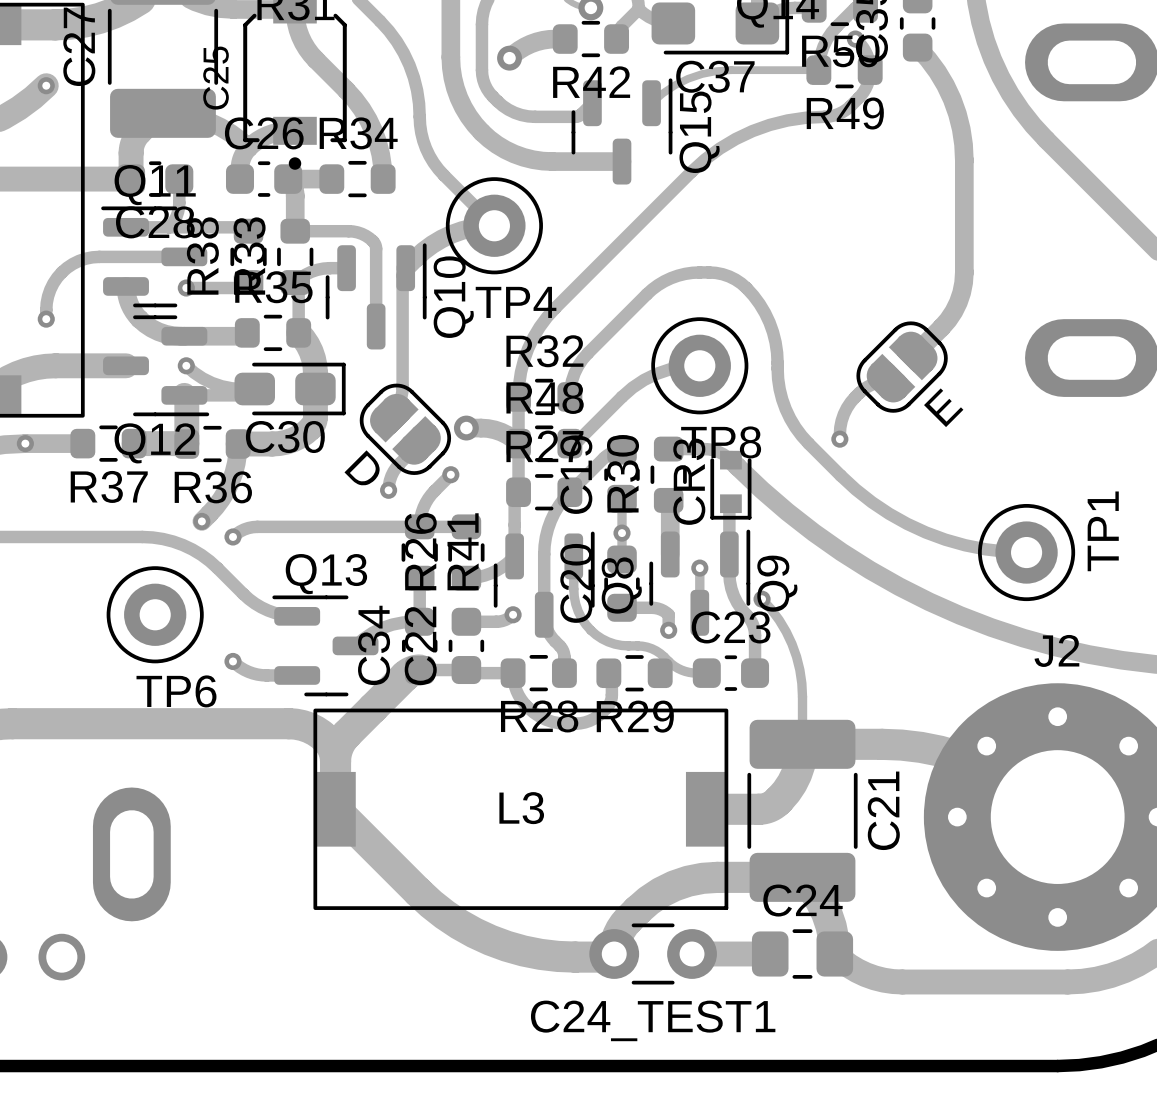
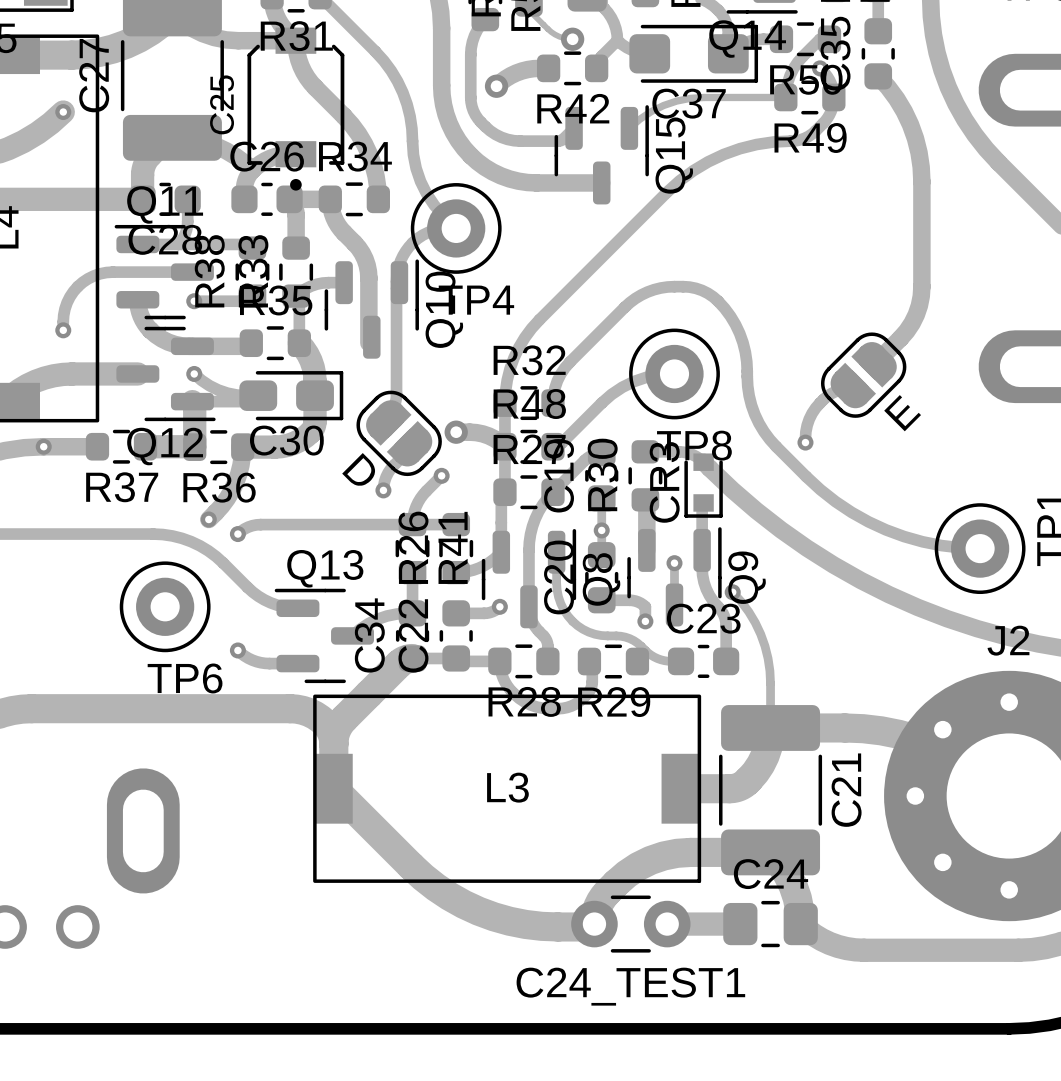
track: (419, 116) (423, 140) (433, 162) (494, 225) (472, 227) (441, 238) (415, 258) (405, 268) (402, 275) -> (412, 141) (416, 168) (426, 193) (434, 205) (456, 228) (434, 230) (422, 235) (412, 243) (405, 251) (398, 265) (396, 289)
track: none -> (330, 199) (335, 221) (358, 247) (367, 265) (368, 343)
TP4 position: (494, 225) -> (456, 228)
track: (295, 231) (353, 231) (365, 235) (373, 242) (376, 248) (376, 326) -> none

